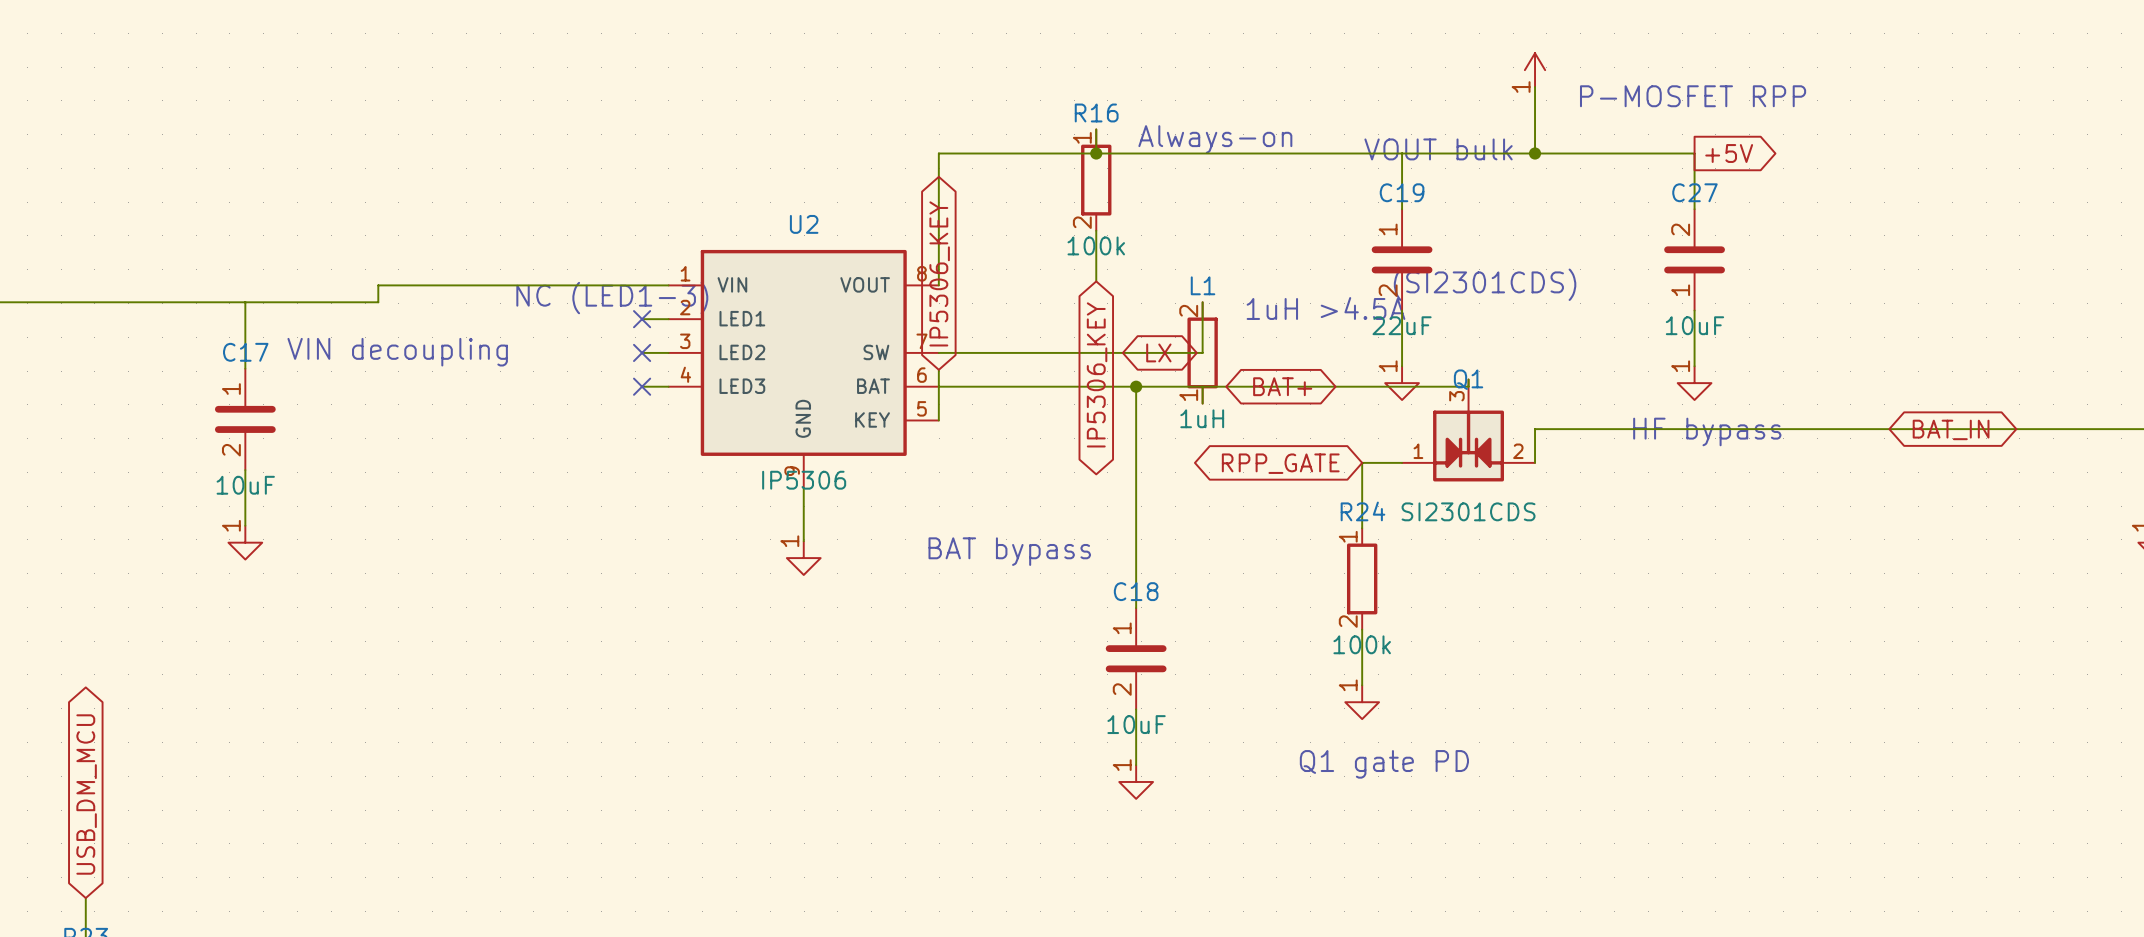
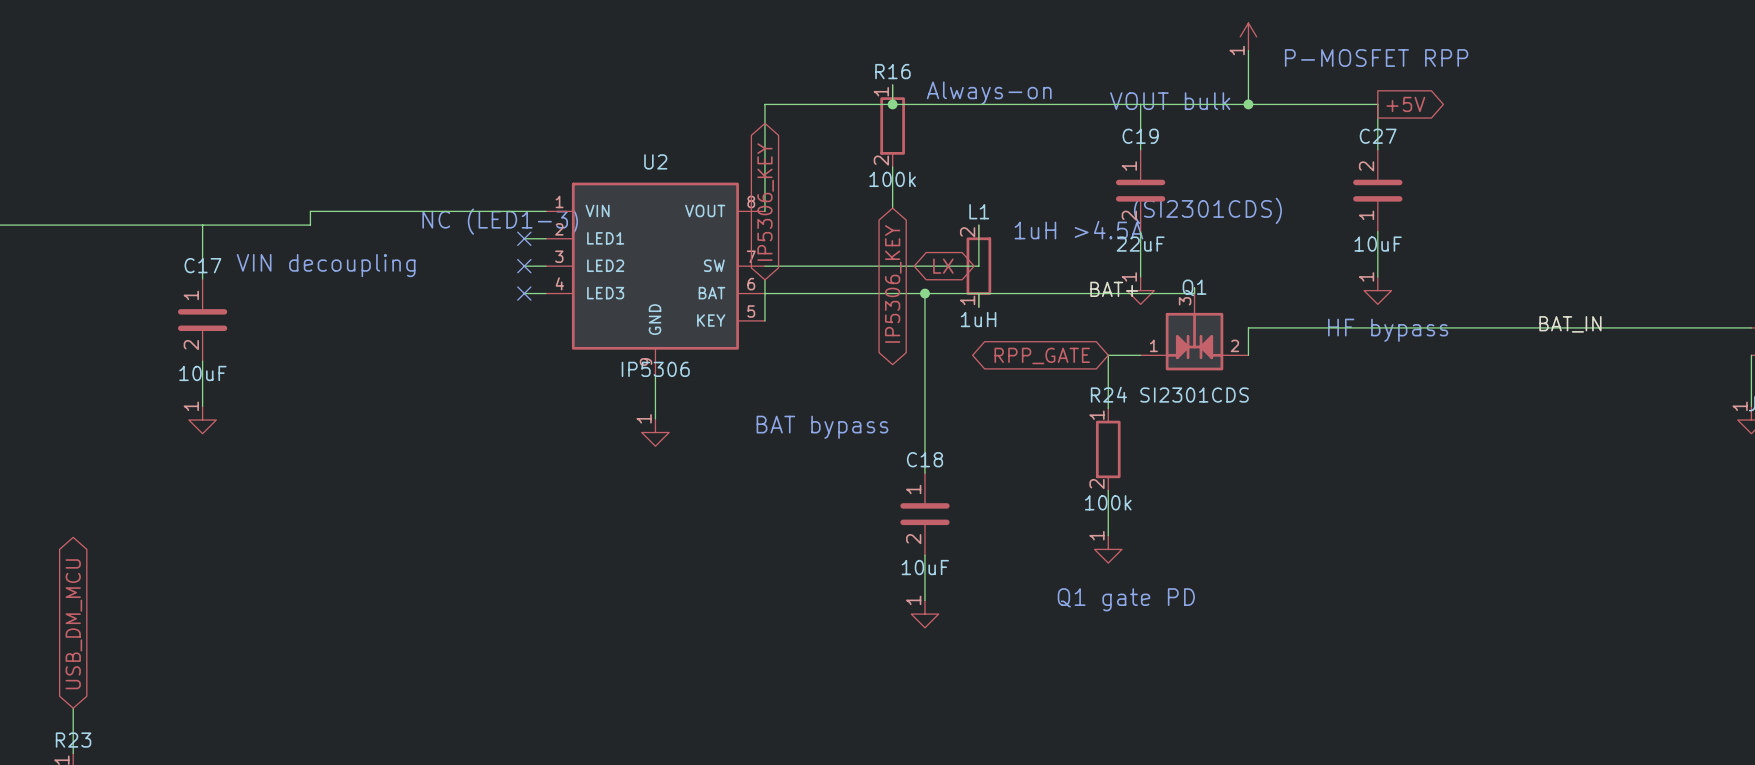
label: none -> BAT+ (1114, 289)
global label: BAT+ (1282, 386) -> none
label: none -> BAT_IN (1570, 324)
global label: BAT_IN (1951, 429) -> none

